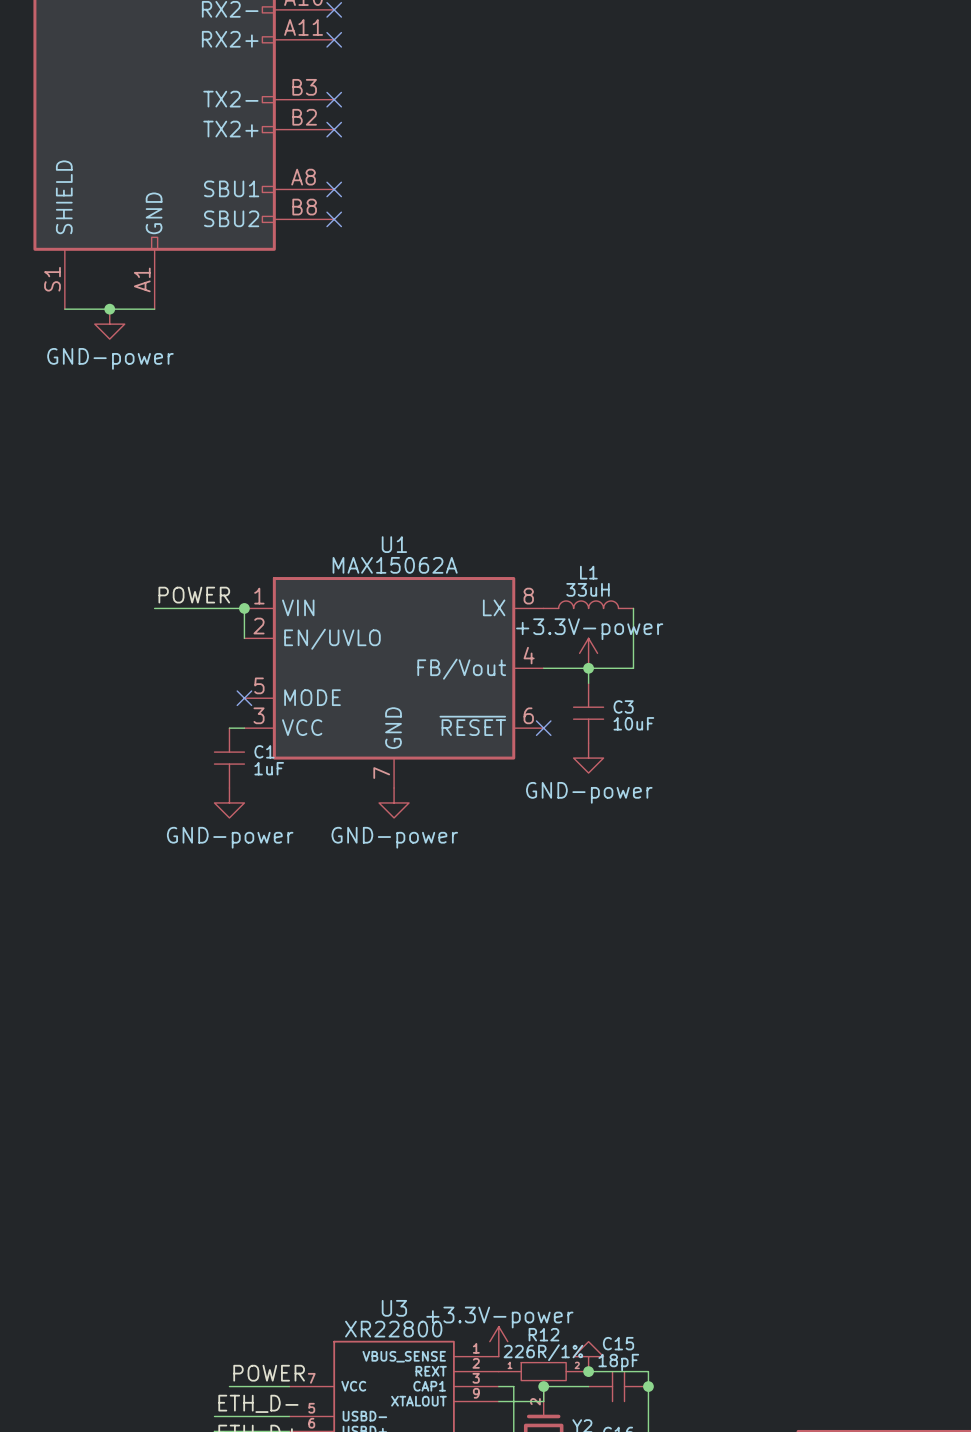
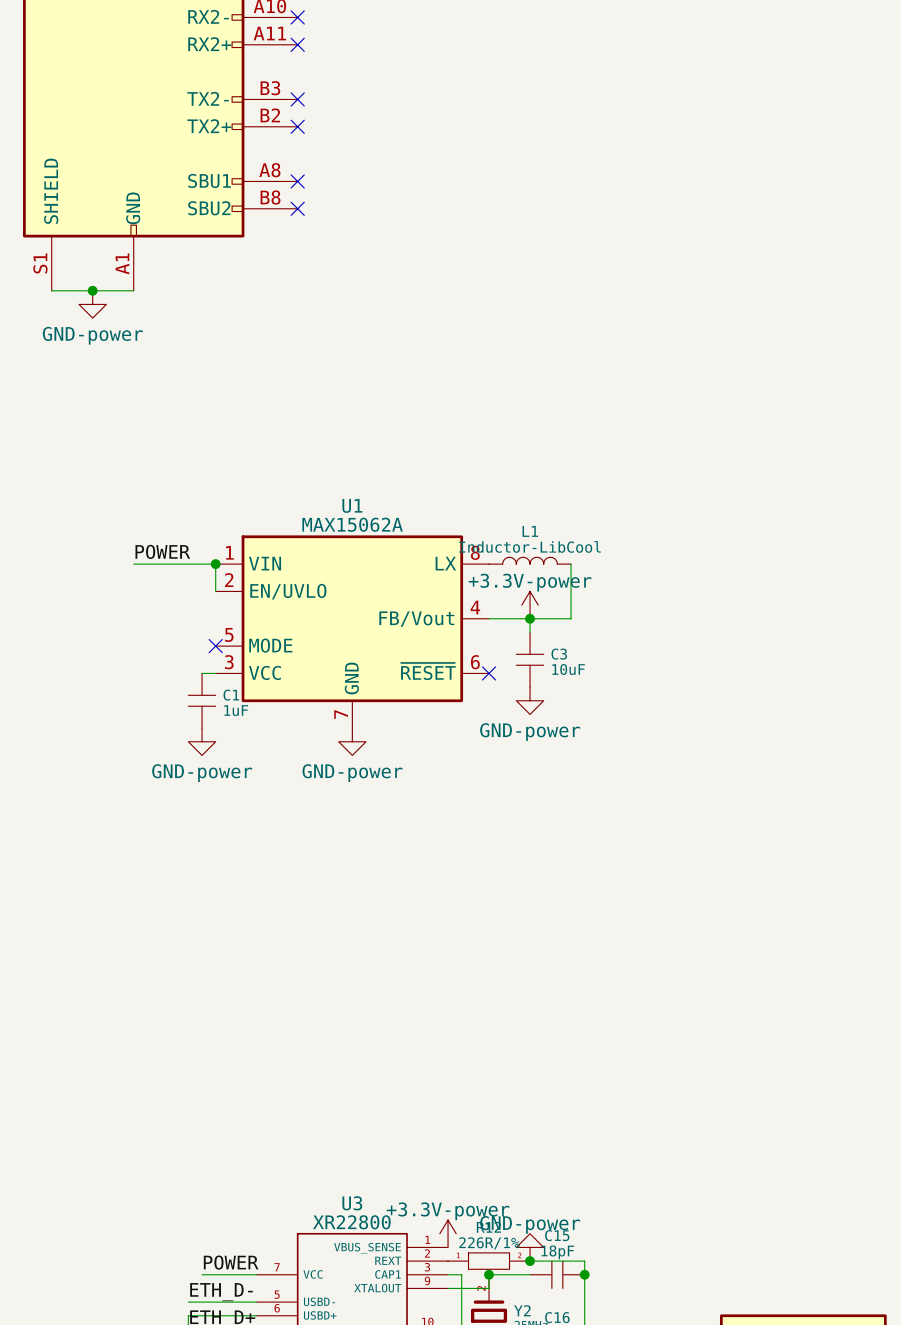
L1 value: 33uH (588, 589) -> Inductor-LibCool (530, 546)
power symbol text: none -> GND-power (530, 1224)

